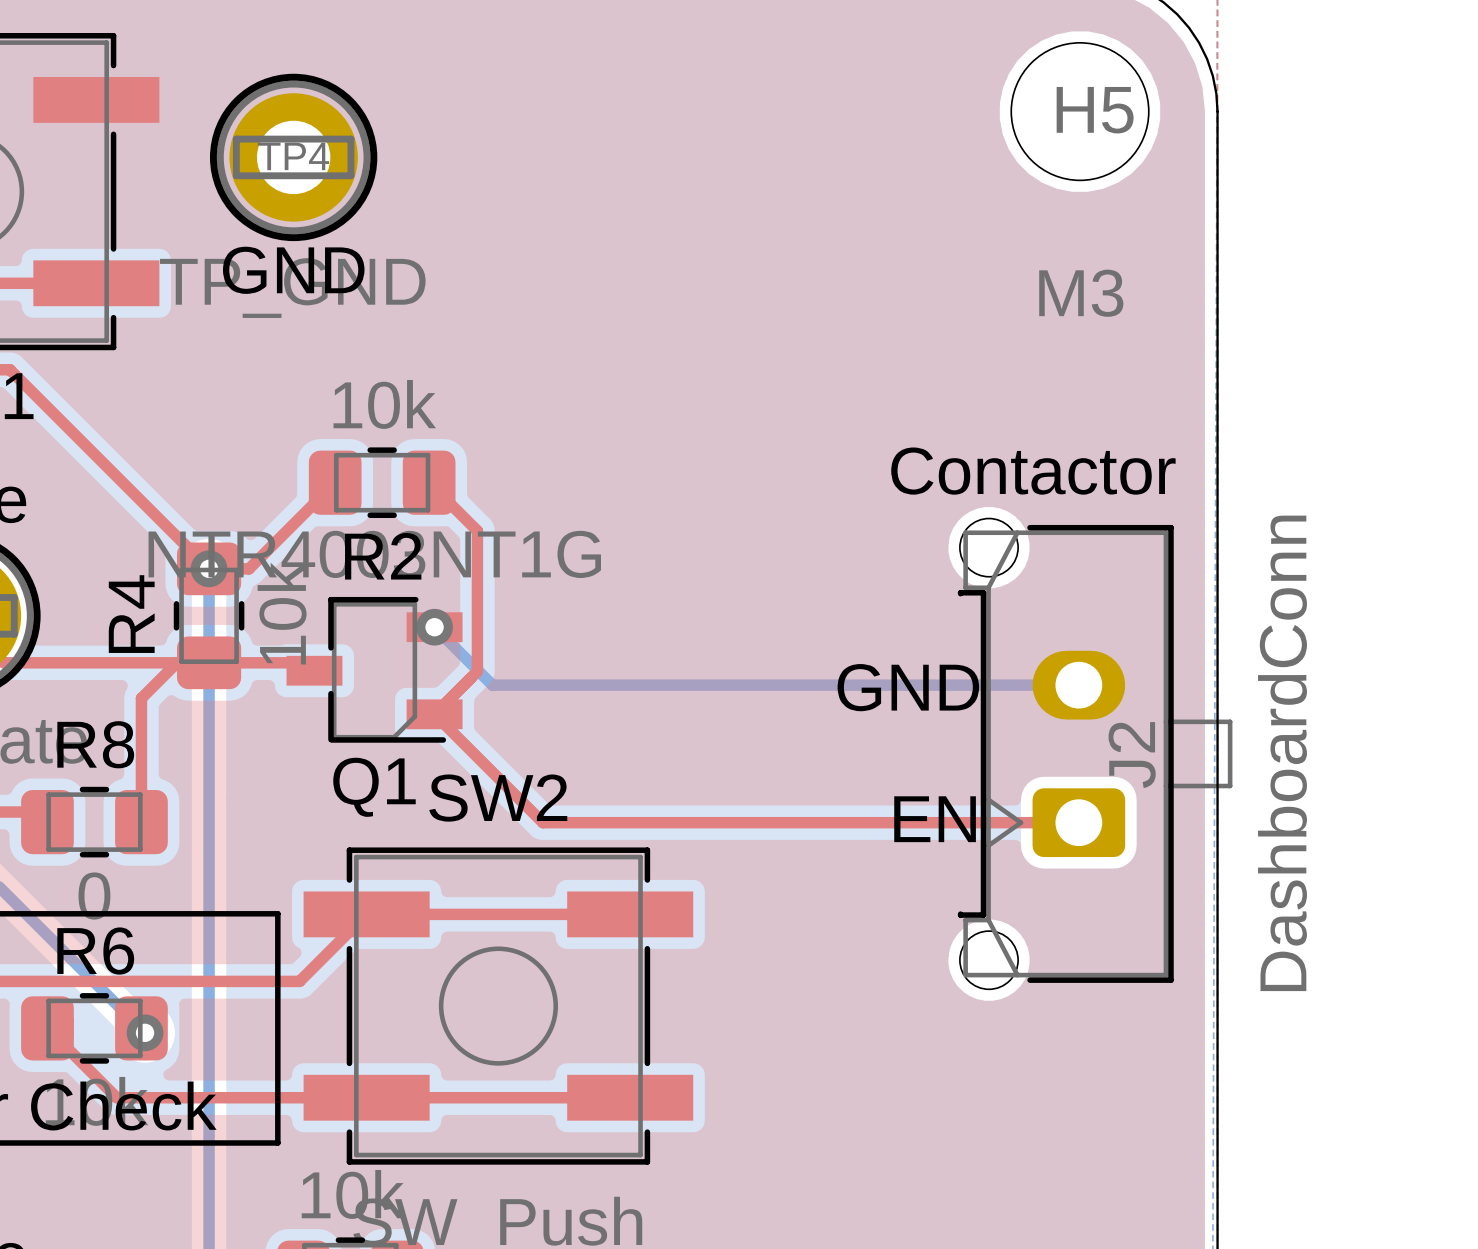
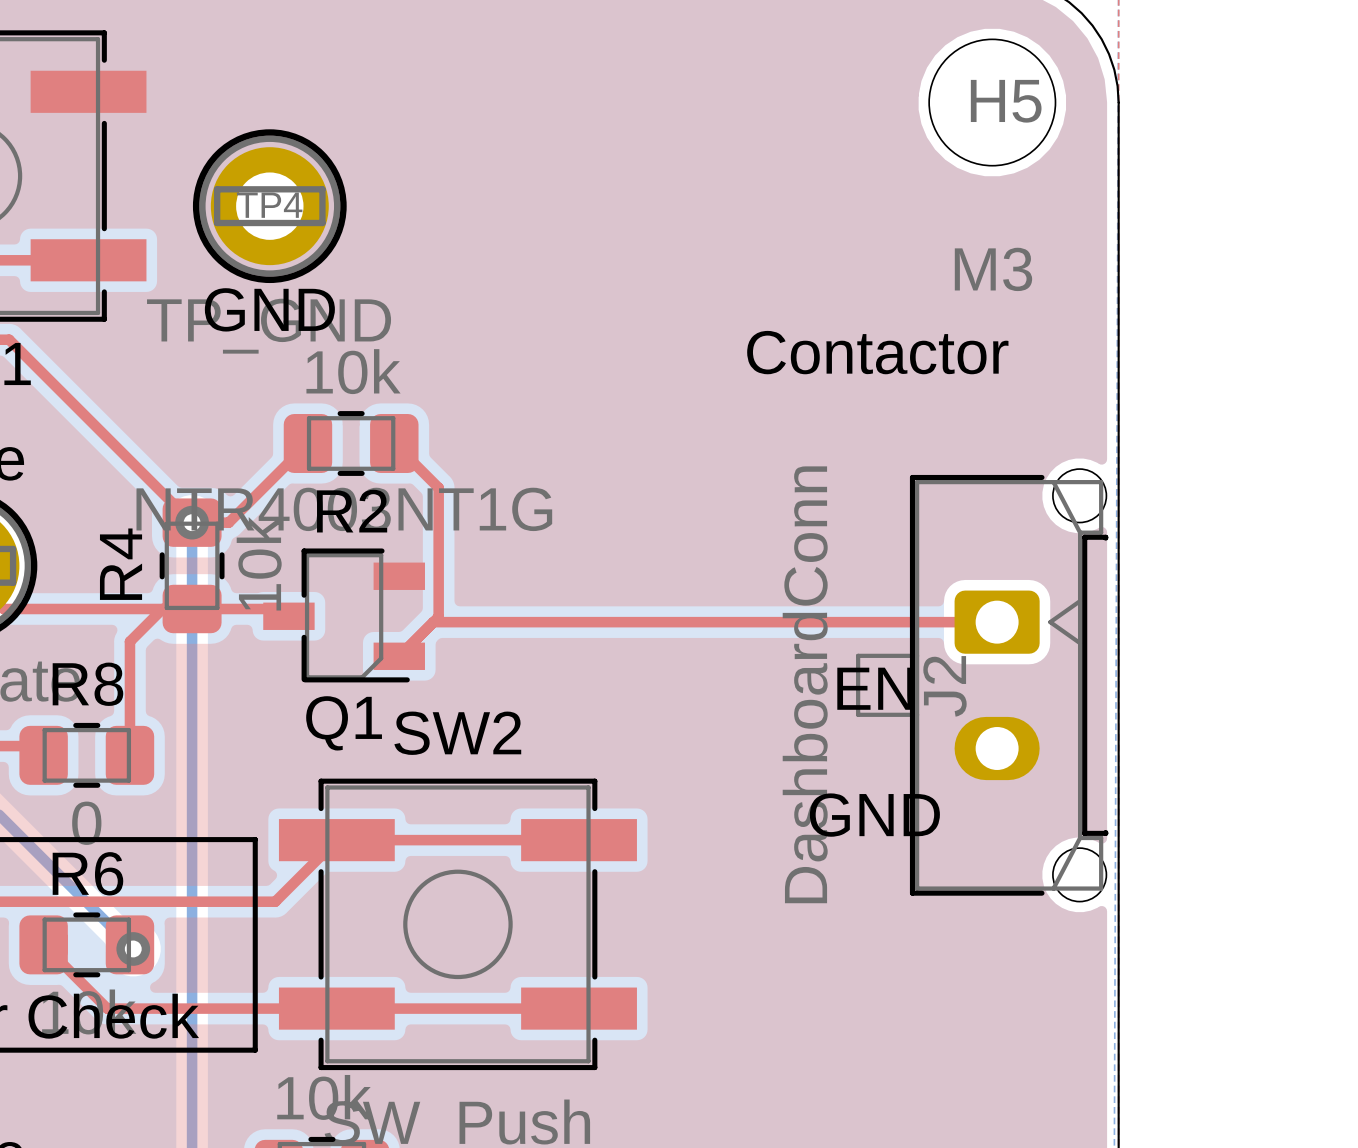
TP4 position: (293, 157) -> (269, 206)
text position: GND (293, 270) -> GND (269, 309)
text position: Contactor (1033, 471) -> Contactor (877, 352)
bottom track: (434, 627) (492, 685) (1078, 685) -> none
via: (434, 627) -> none
top track: none -> (433, 622) (997, 622)
text position: GND (908, 687) -> GND (874, 815)
top track: (434, 714) (542, 822) (1078, 822) -> none
J2 rotation: 0° (1095, 753) -> 180° (982, 685)
text position: EN (935, 819) -> EN (874, 688)

